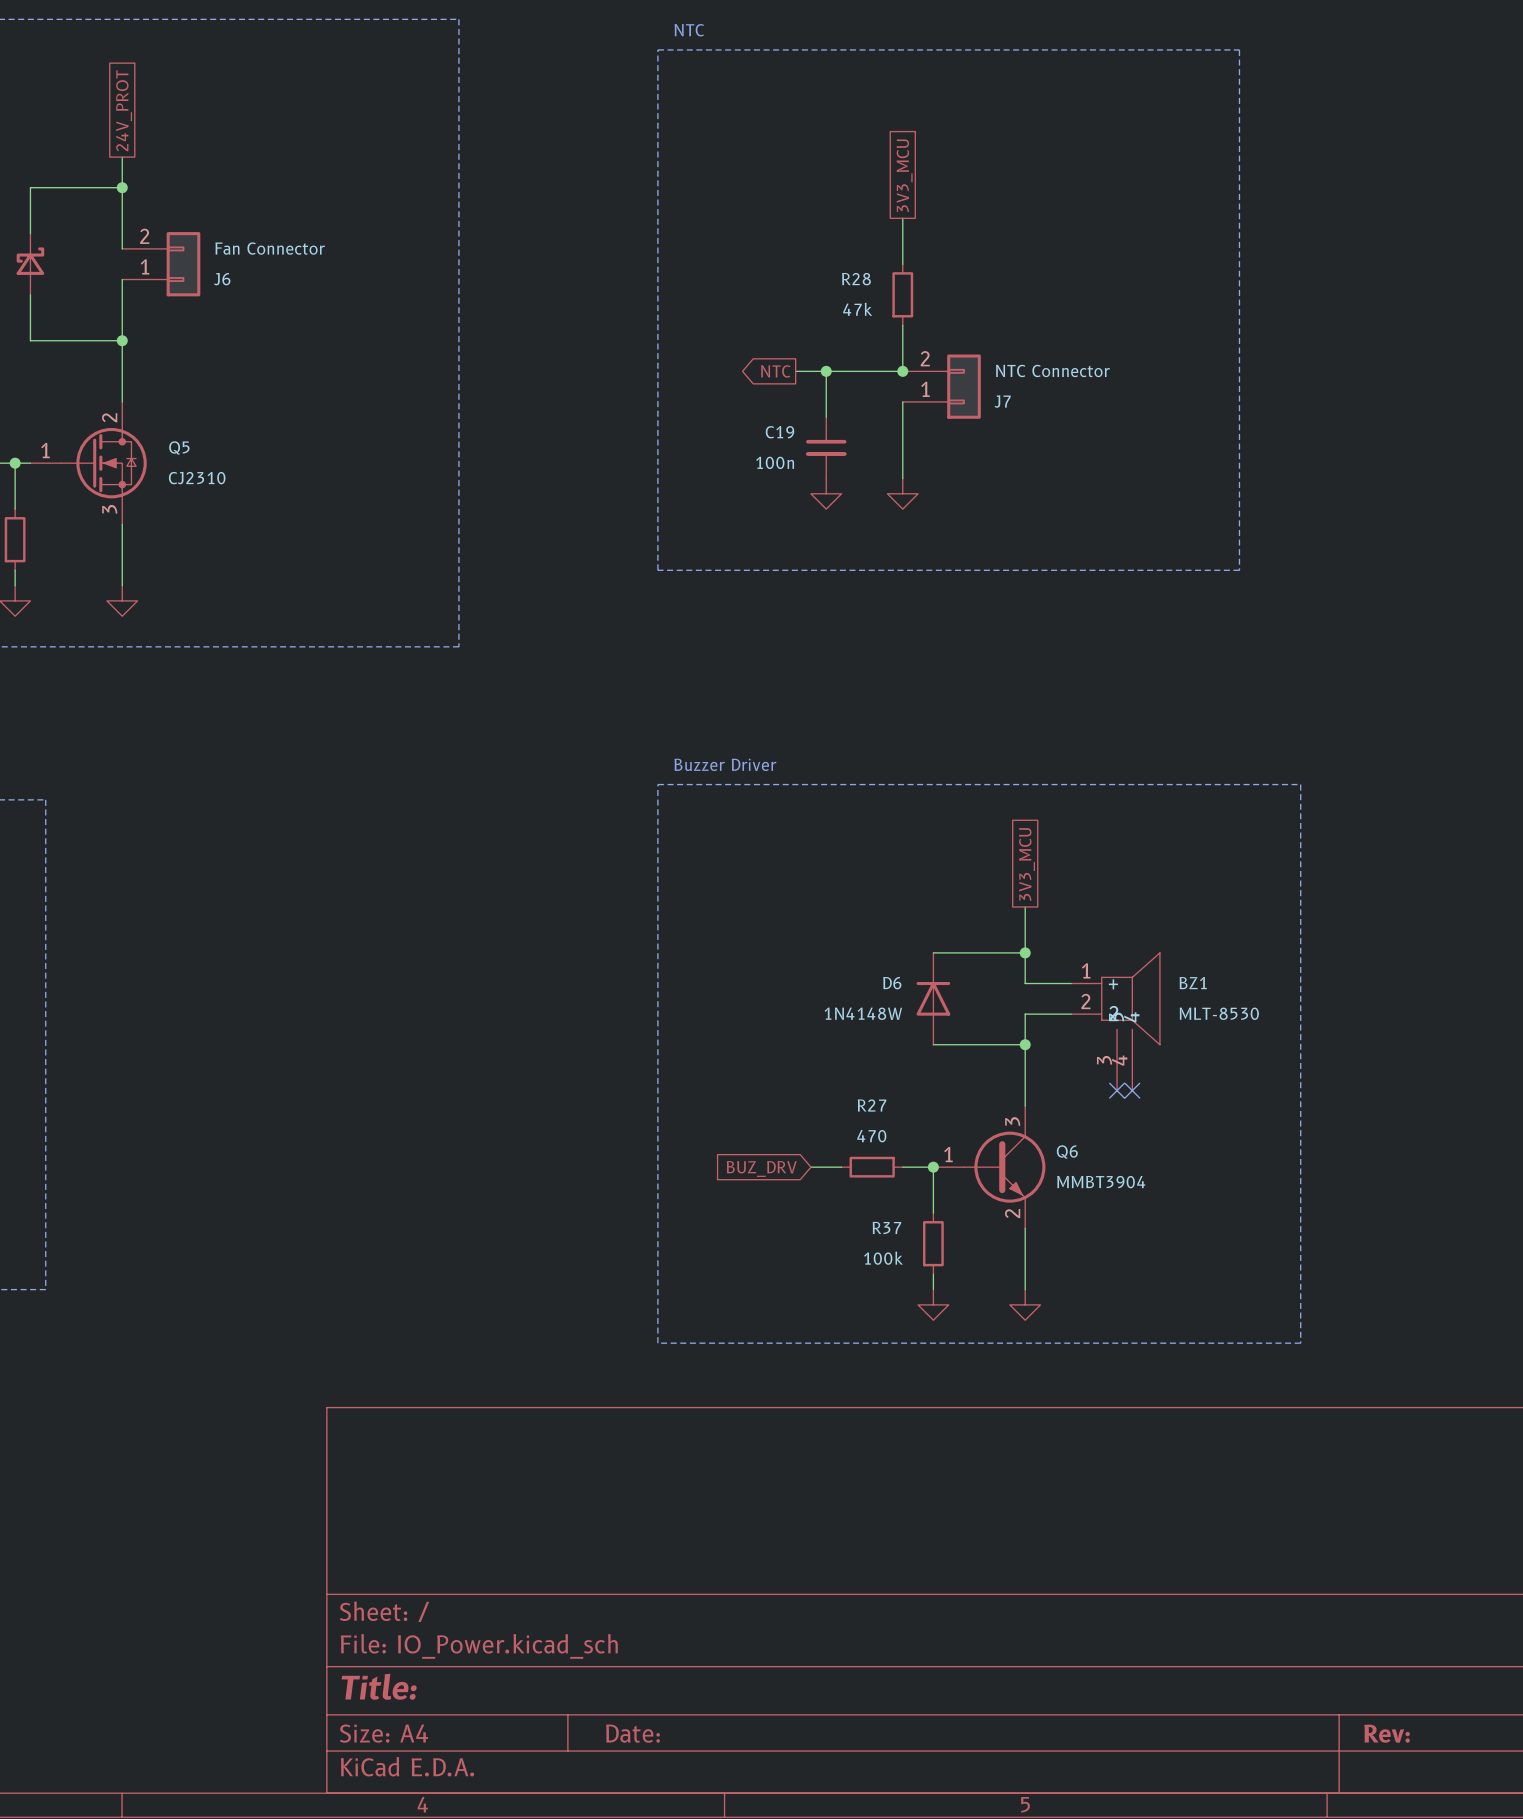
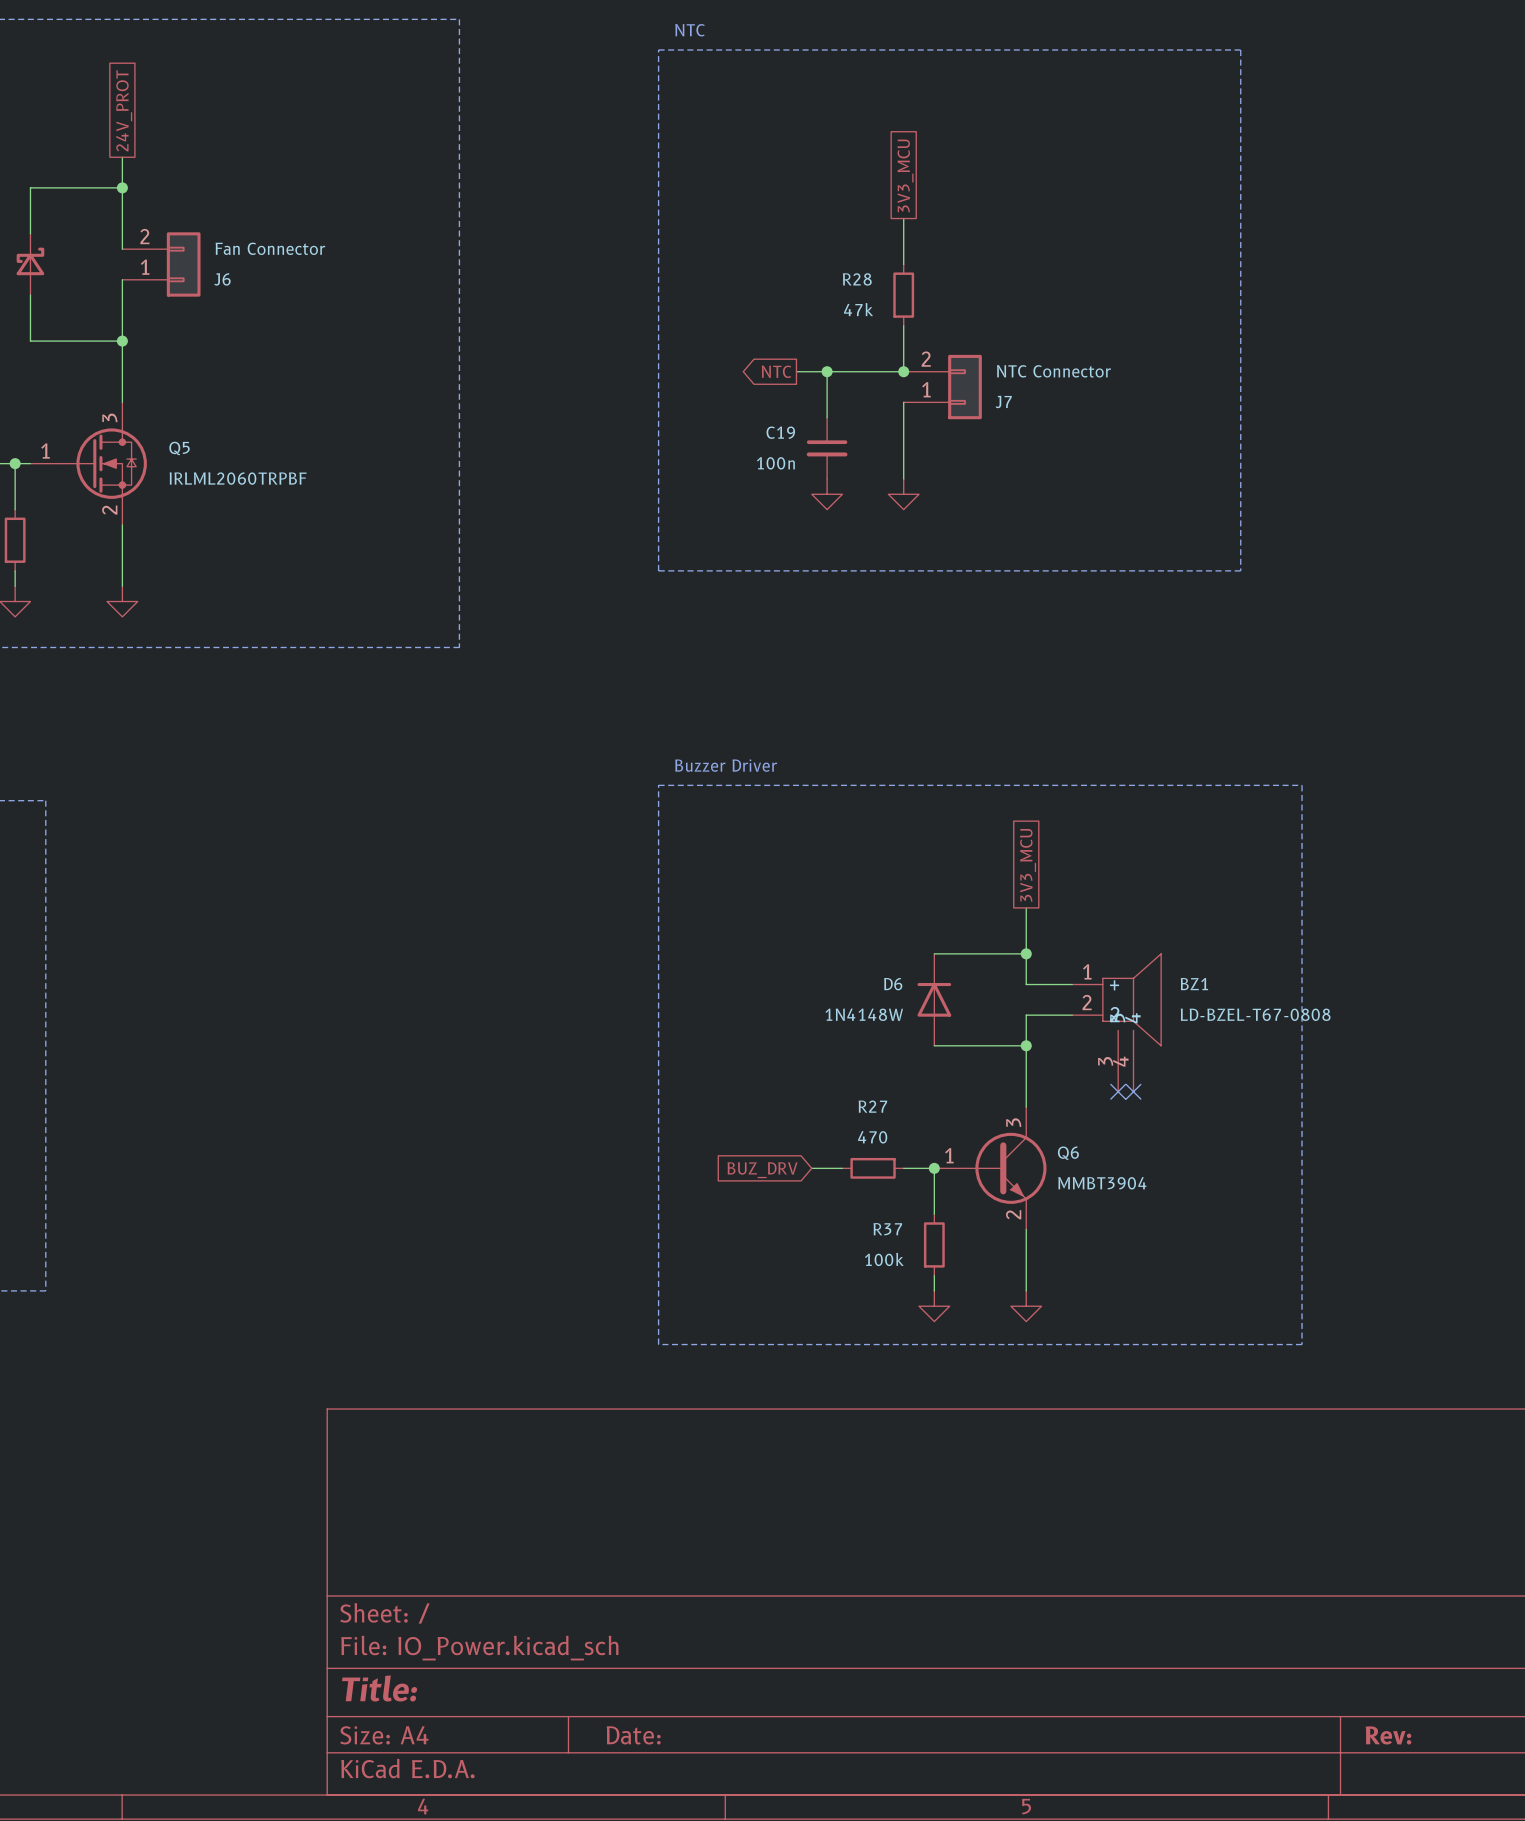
Q5 pin number: 2 (109, 417) -> 3 (109, 417)
Q5 value: CJ2310 (197, 478) -> IRLML2060TRPBF (238, 478)
Q5 pin number: 3 (109, 509) -> 2 (109, 510)
BZ1 value: MLT-8530 (1219, 1013) -> LD-BZEL-T67-0808 (1255, 1014)

